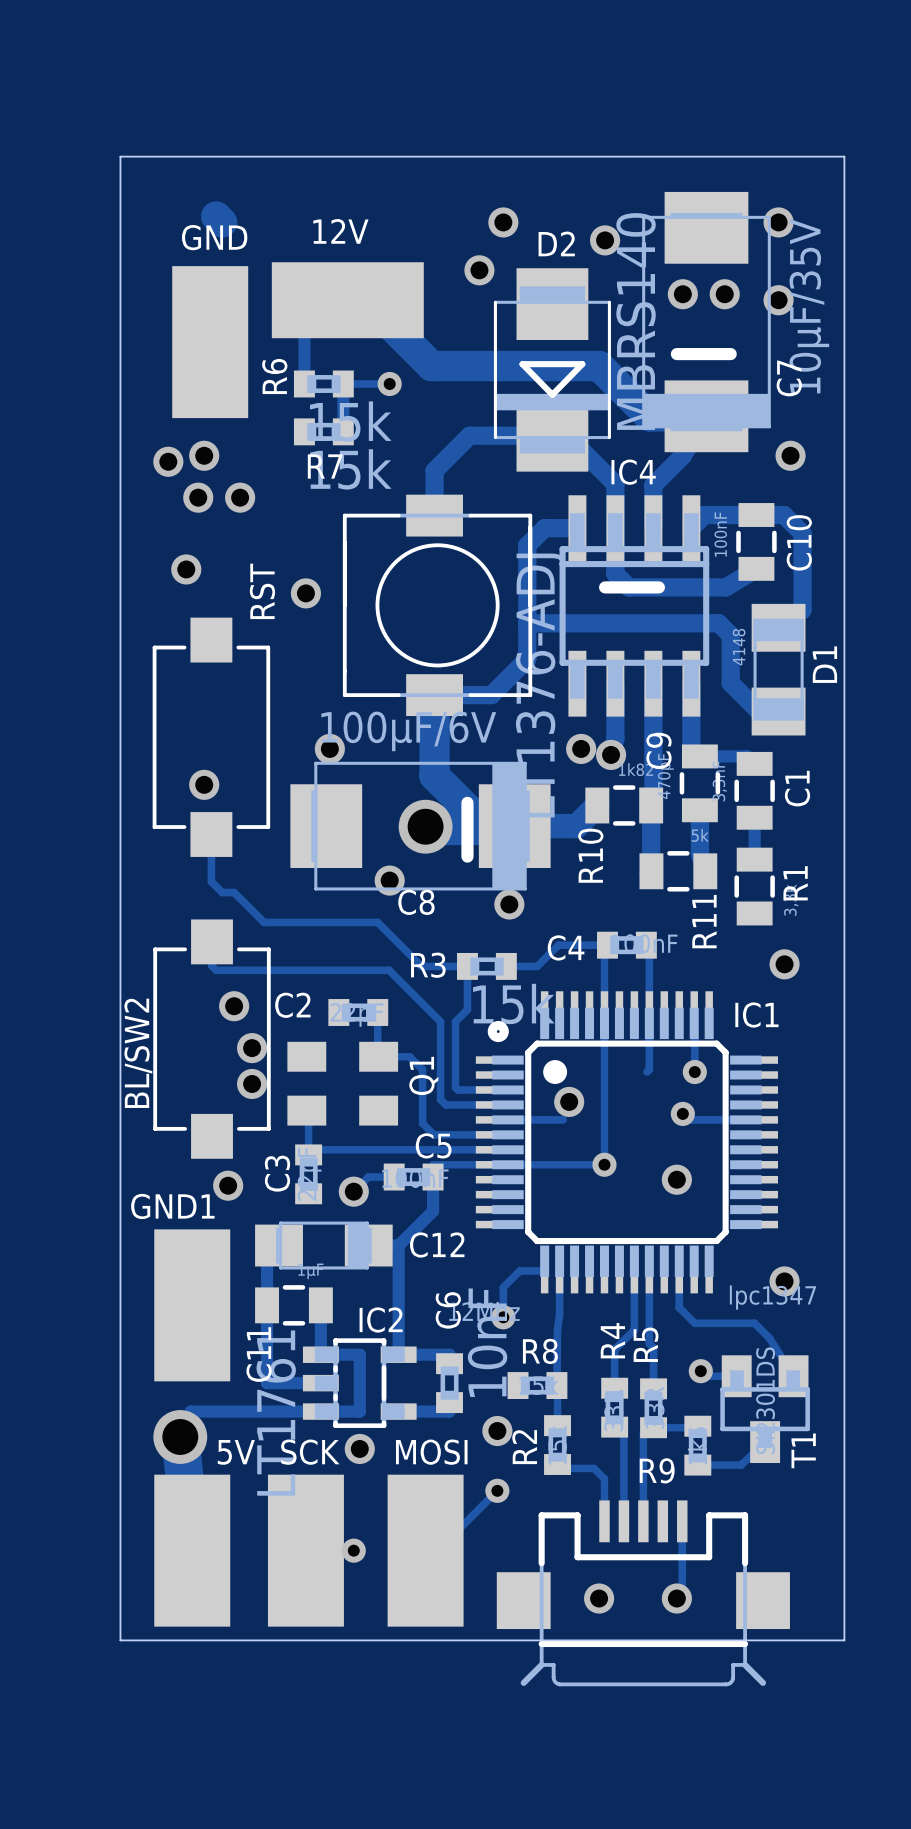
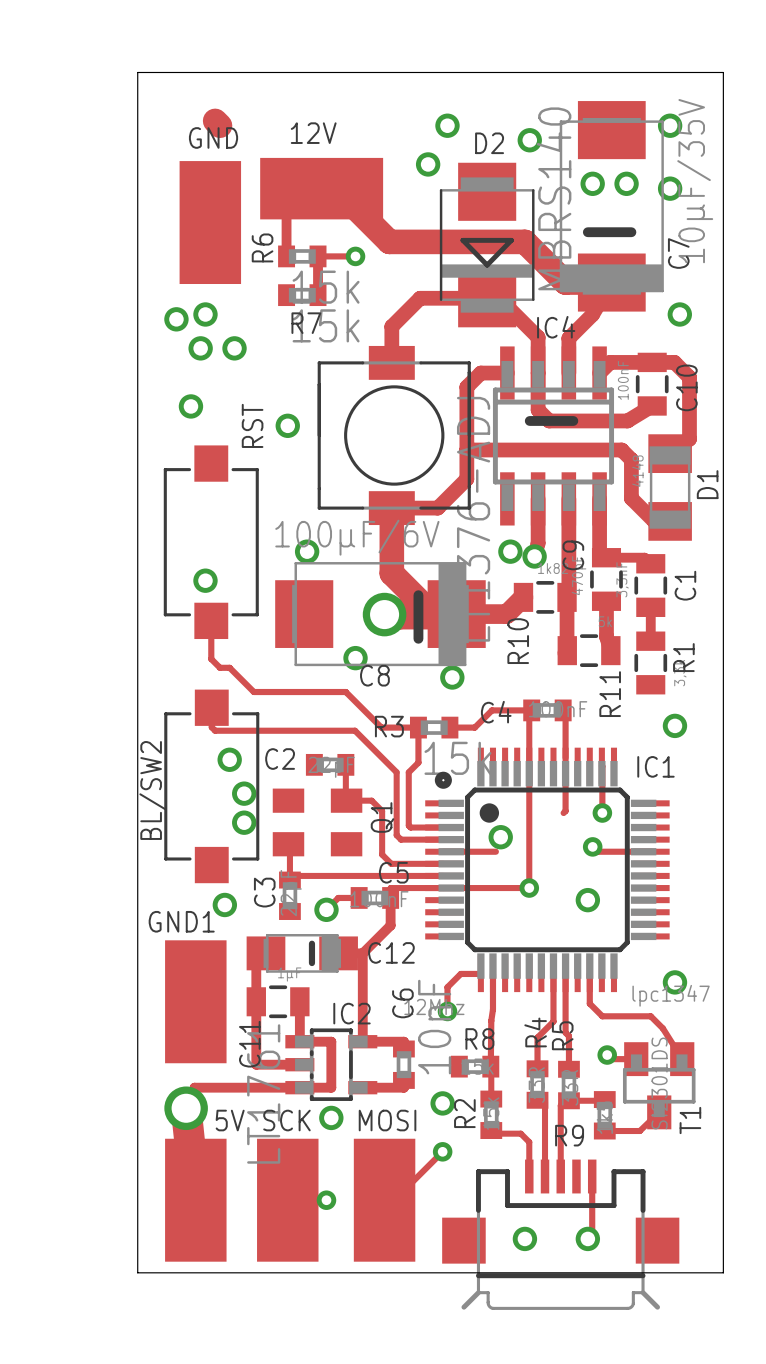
line: none -> (311, 943) (311, 963)

